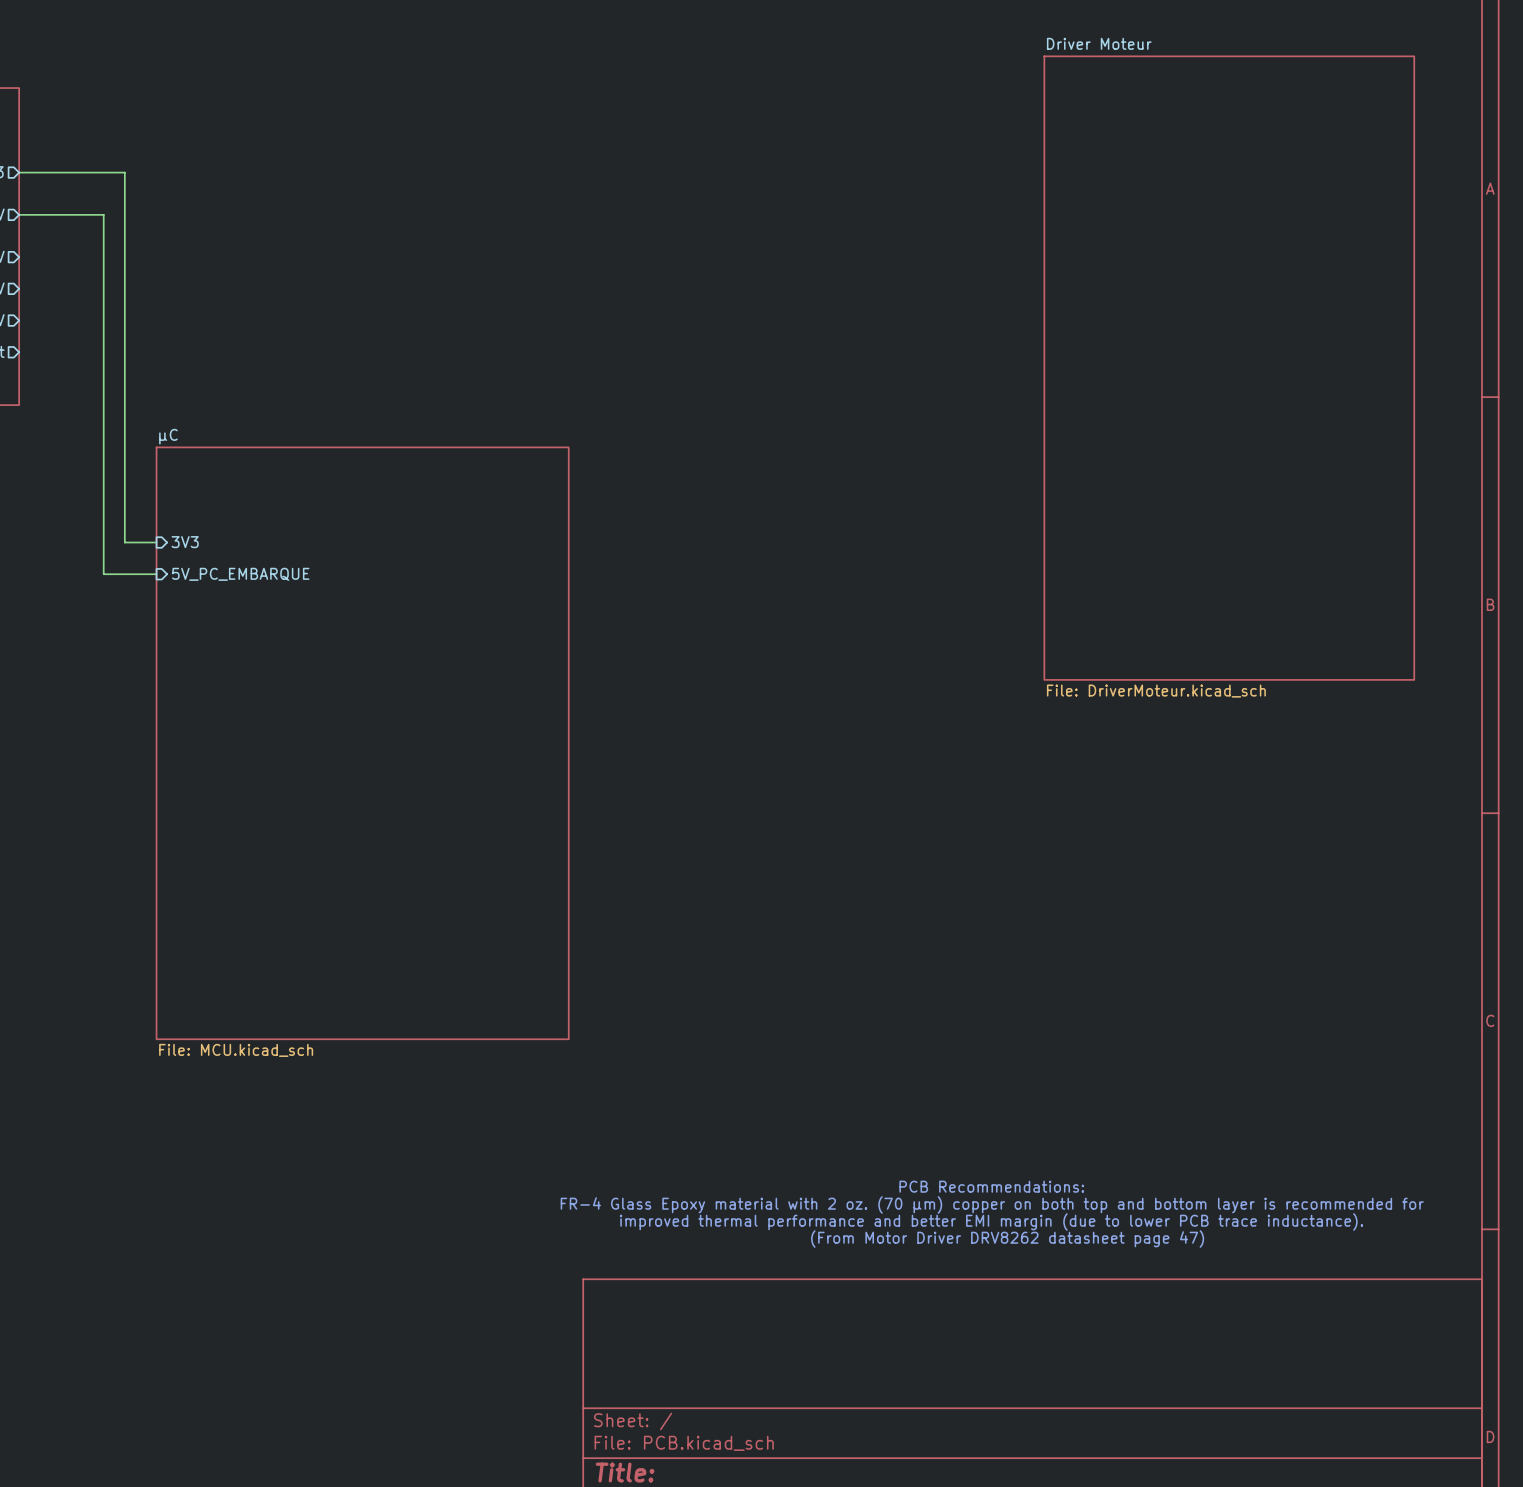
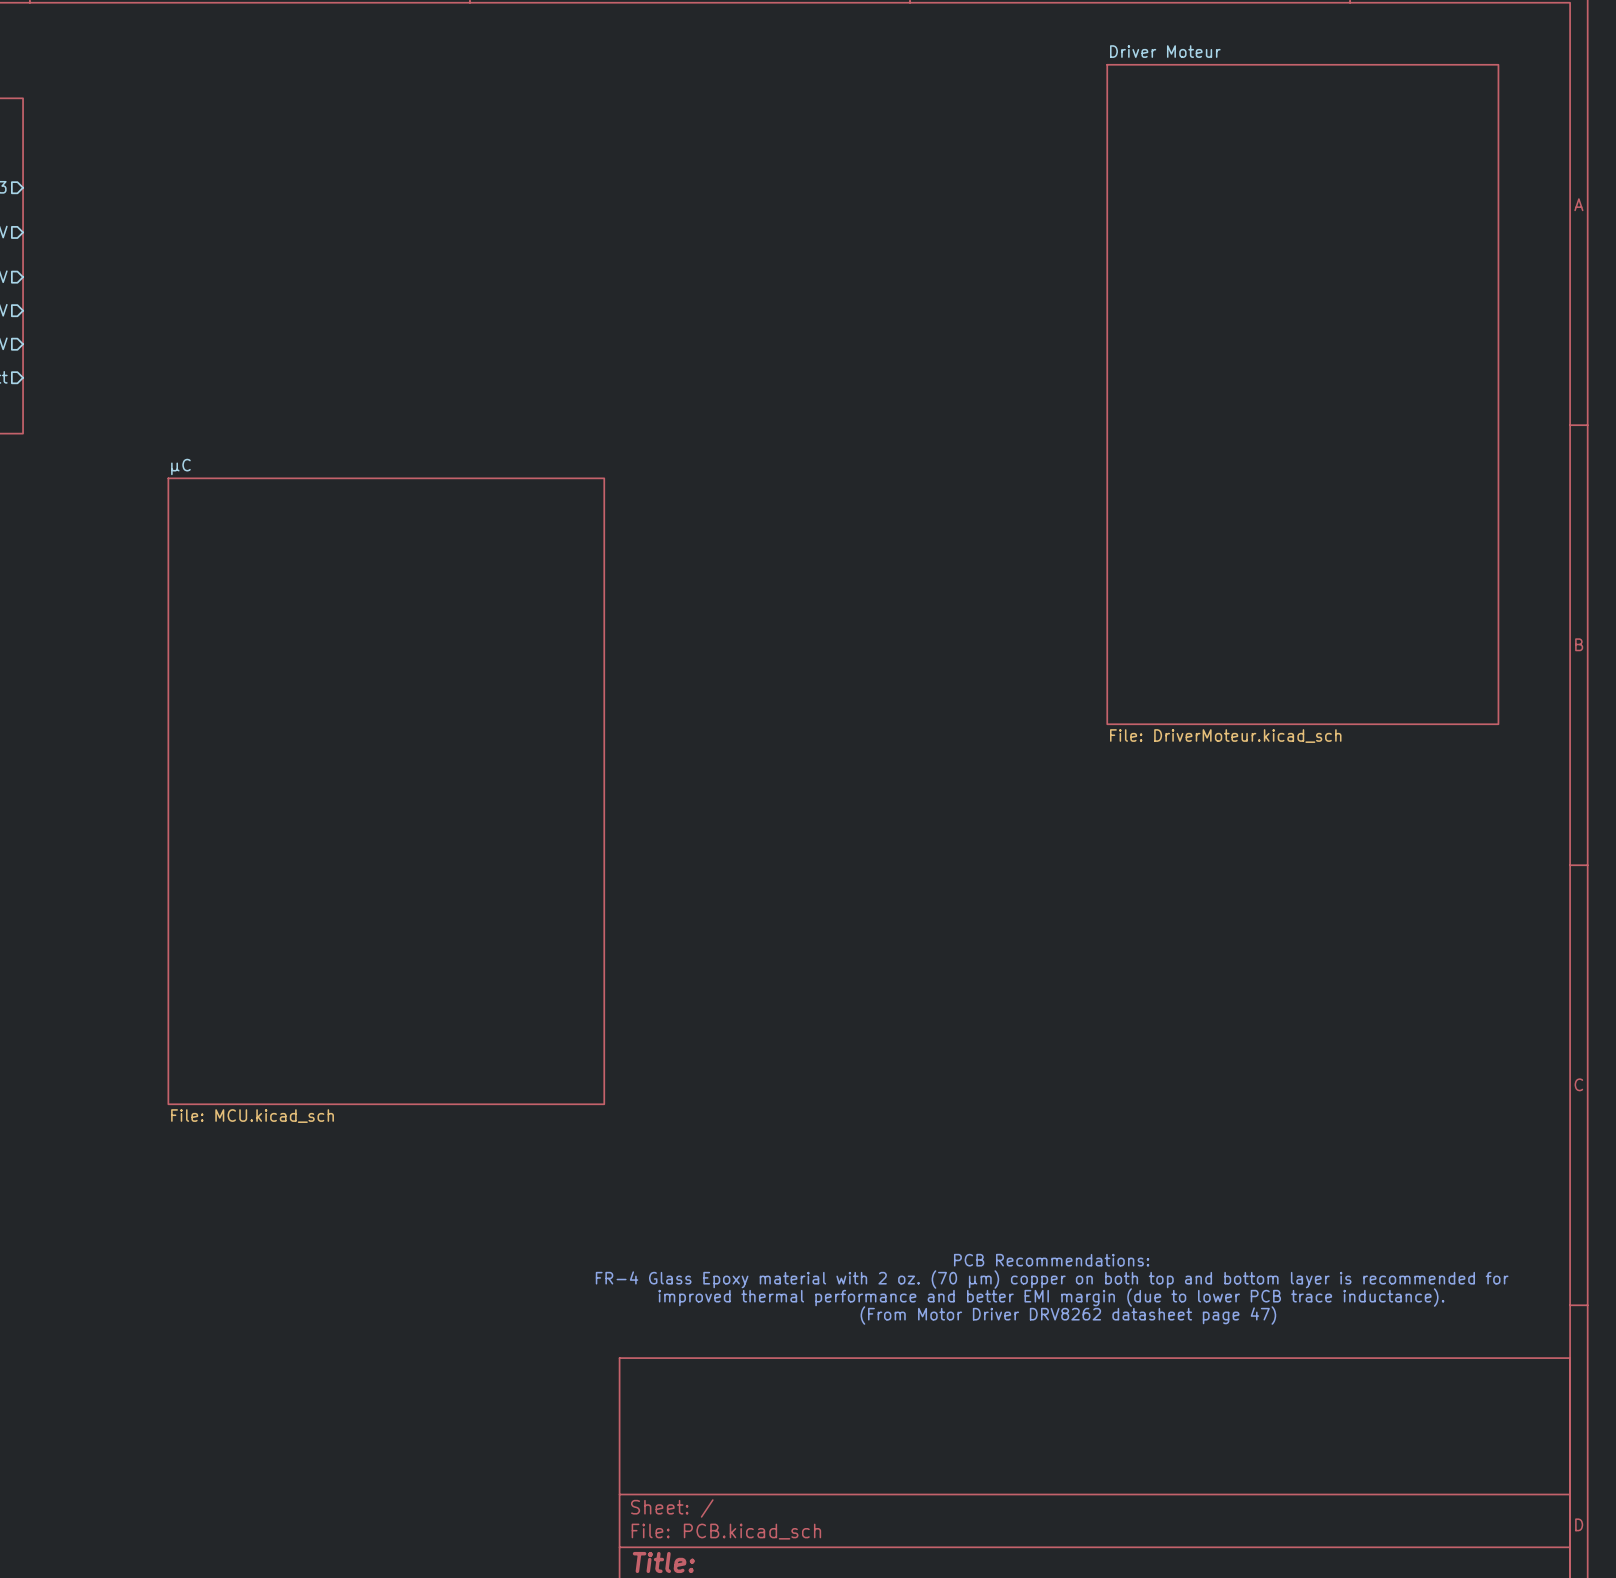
wire: (19, 172) (124, 172) (124, 542) (156, 542) -> none
wire: (19, 214) (103, 214) (103, 574) (156, 574) -> none
sheet pin: 3V3 (185, 542) -> none
sheet pin: 5V_PC_EMBARQUE (240, 574) -> none

